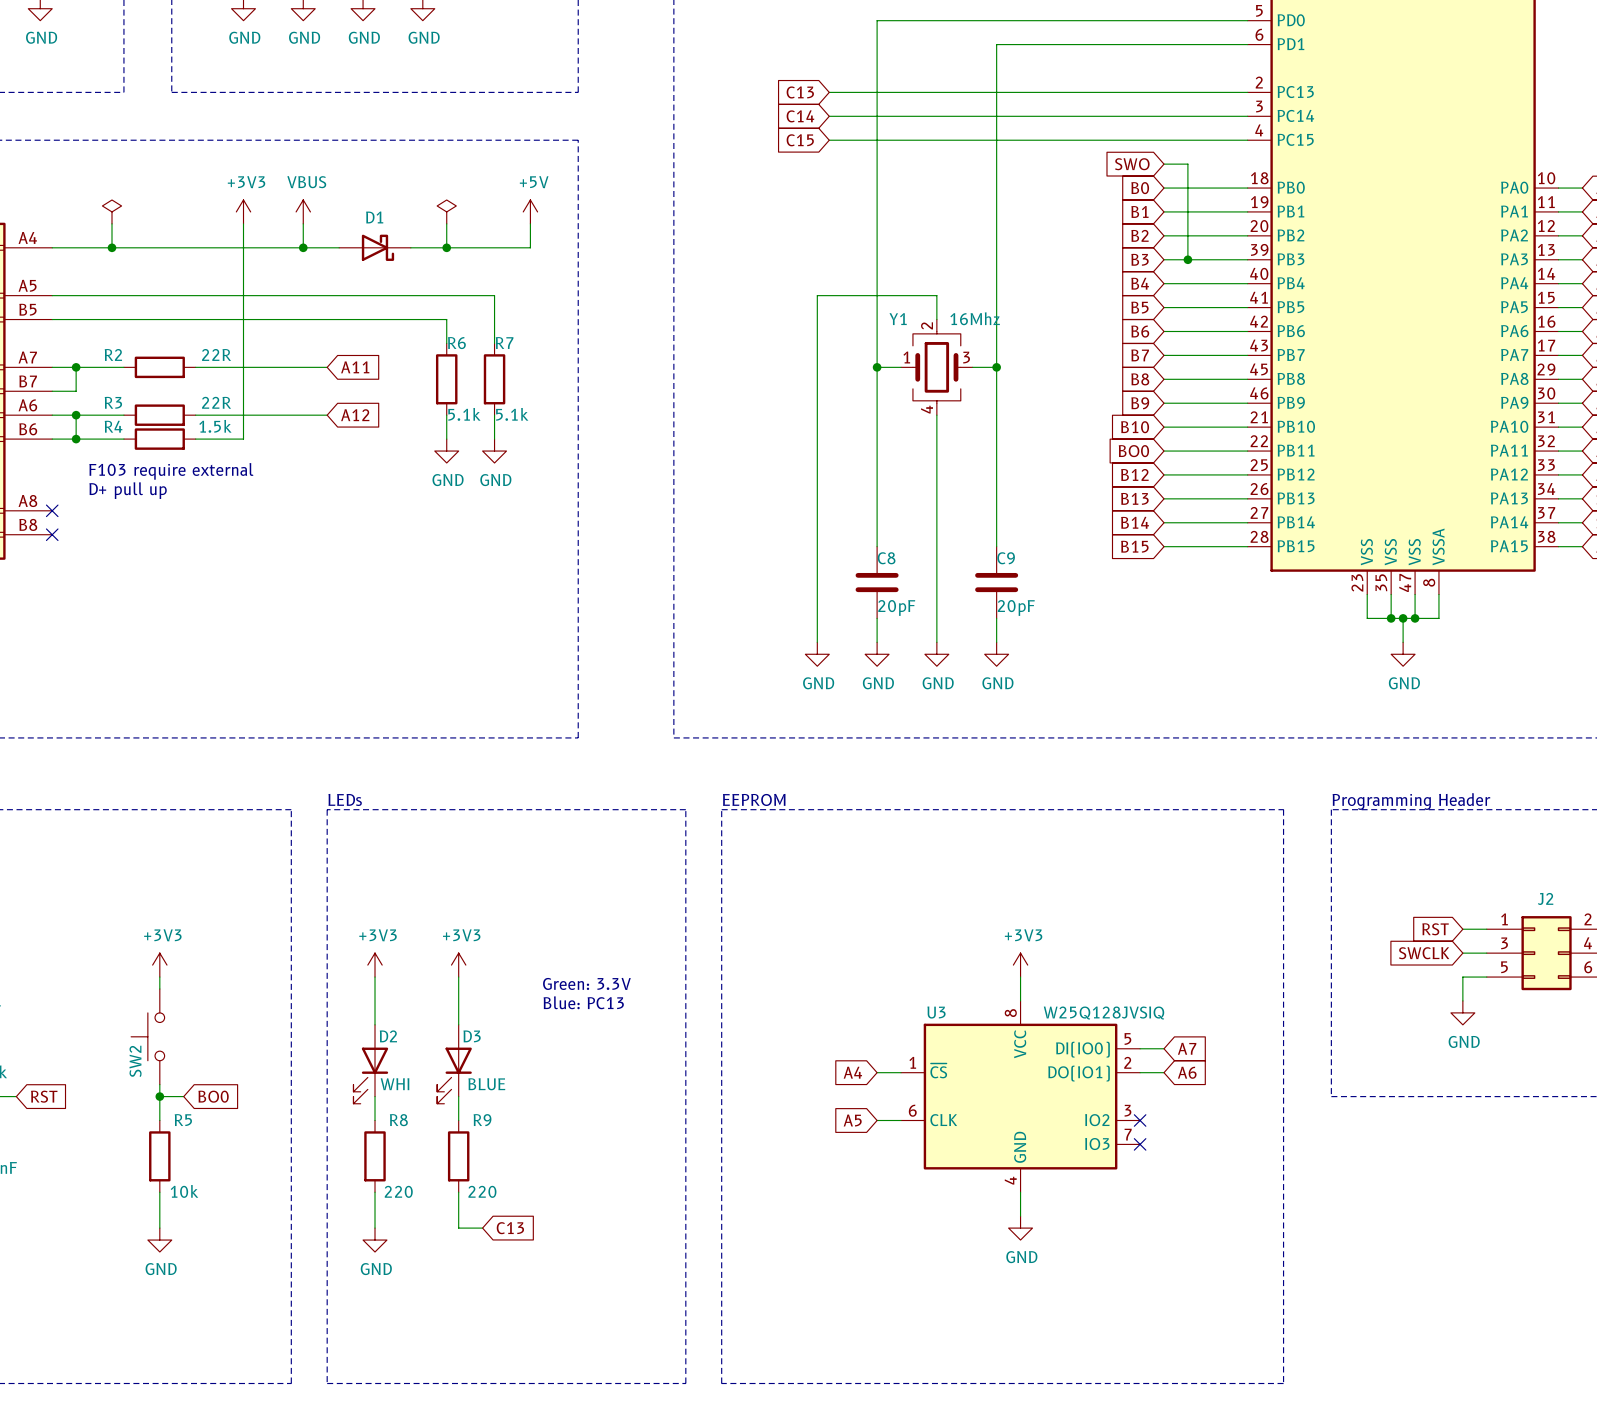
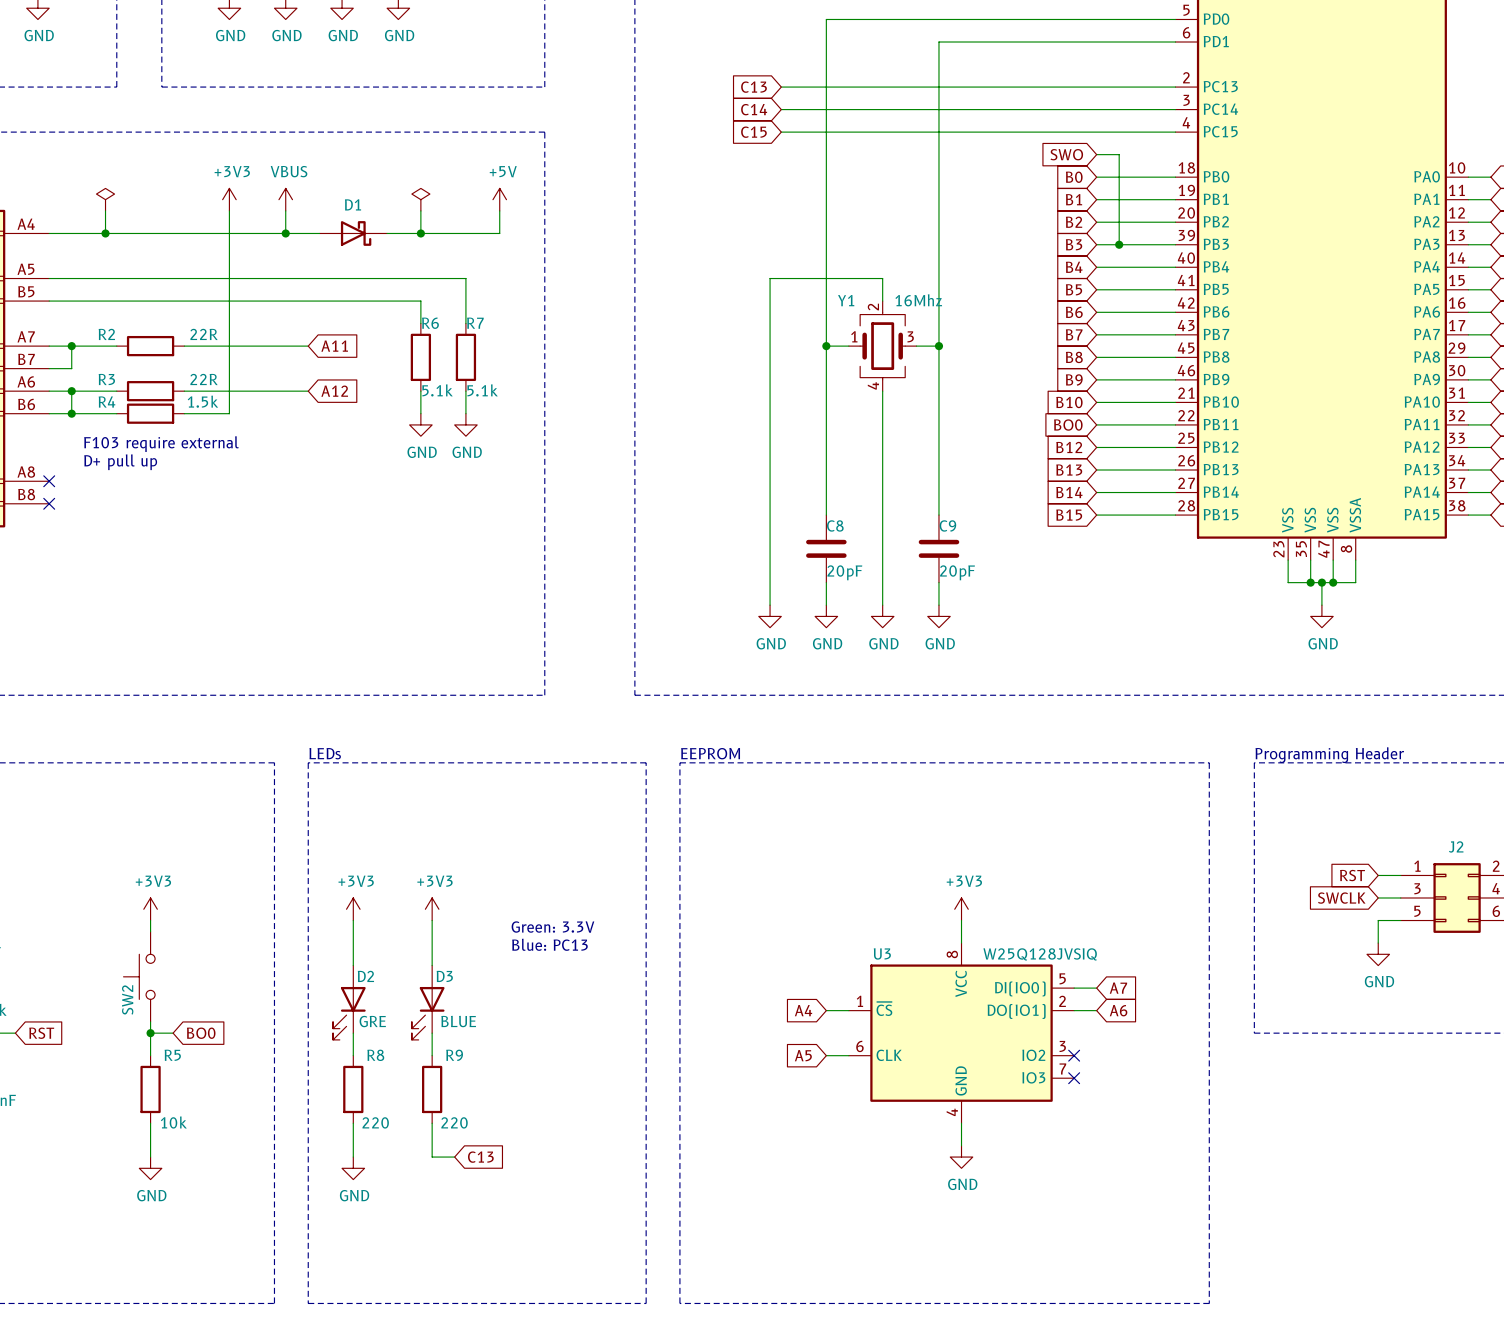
D2 value: WHI (395, 1084) -> GRE (372, 1021)

